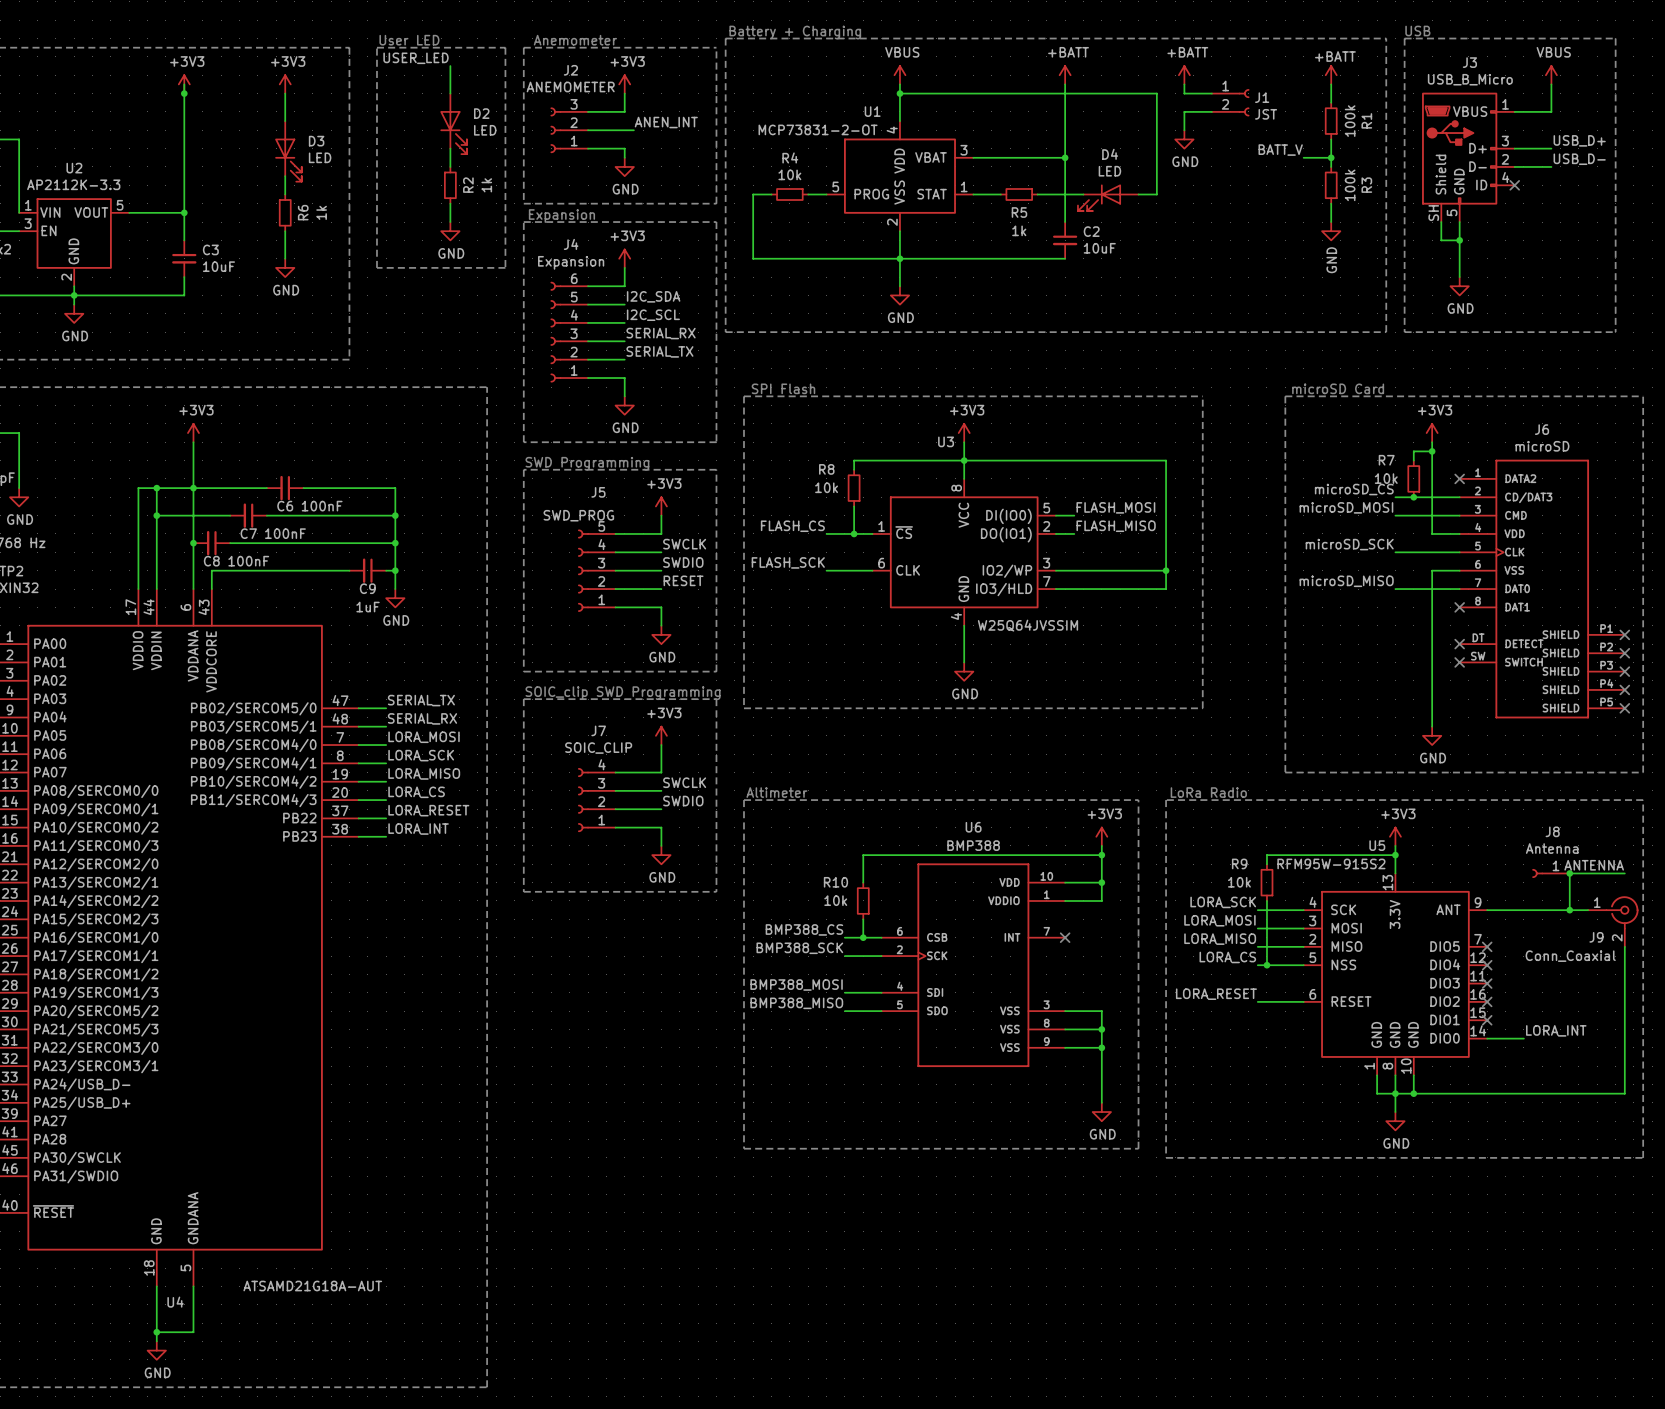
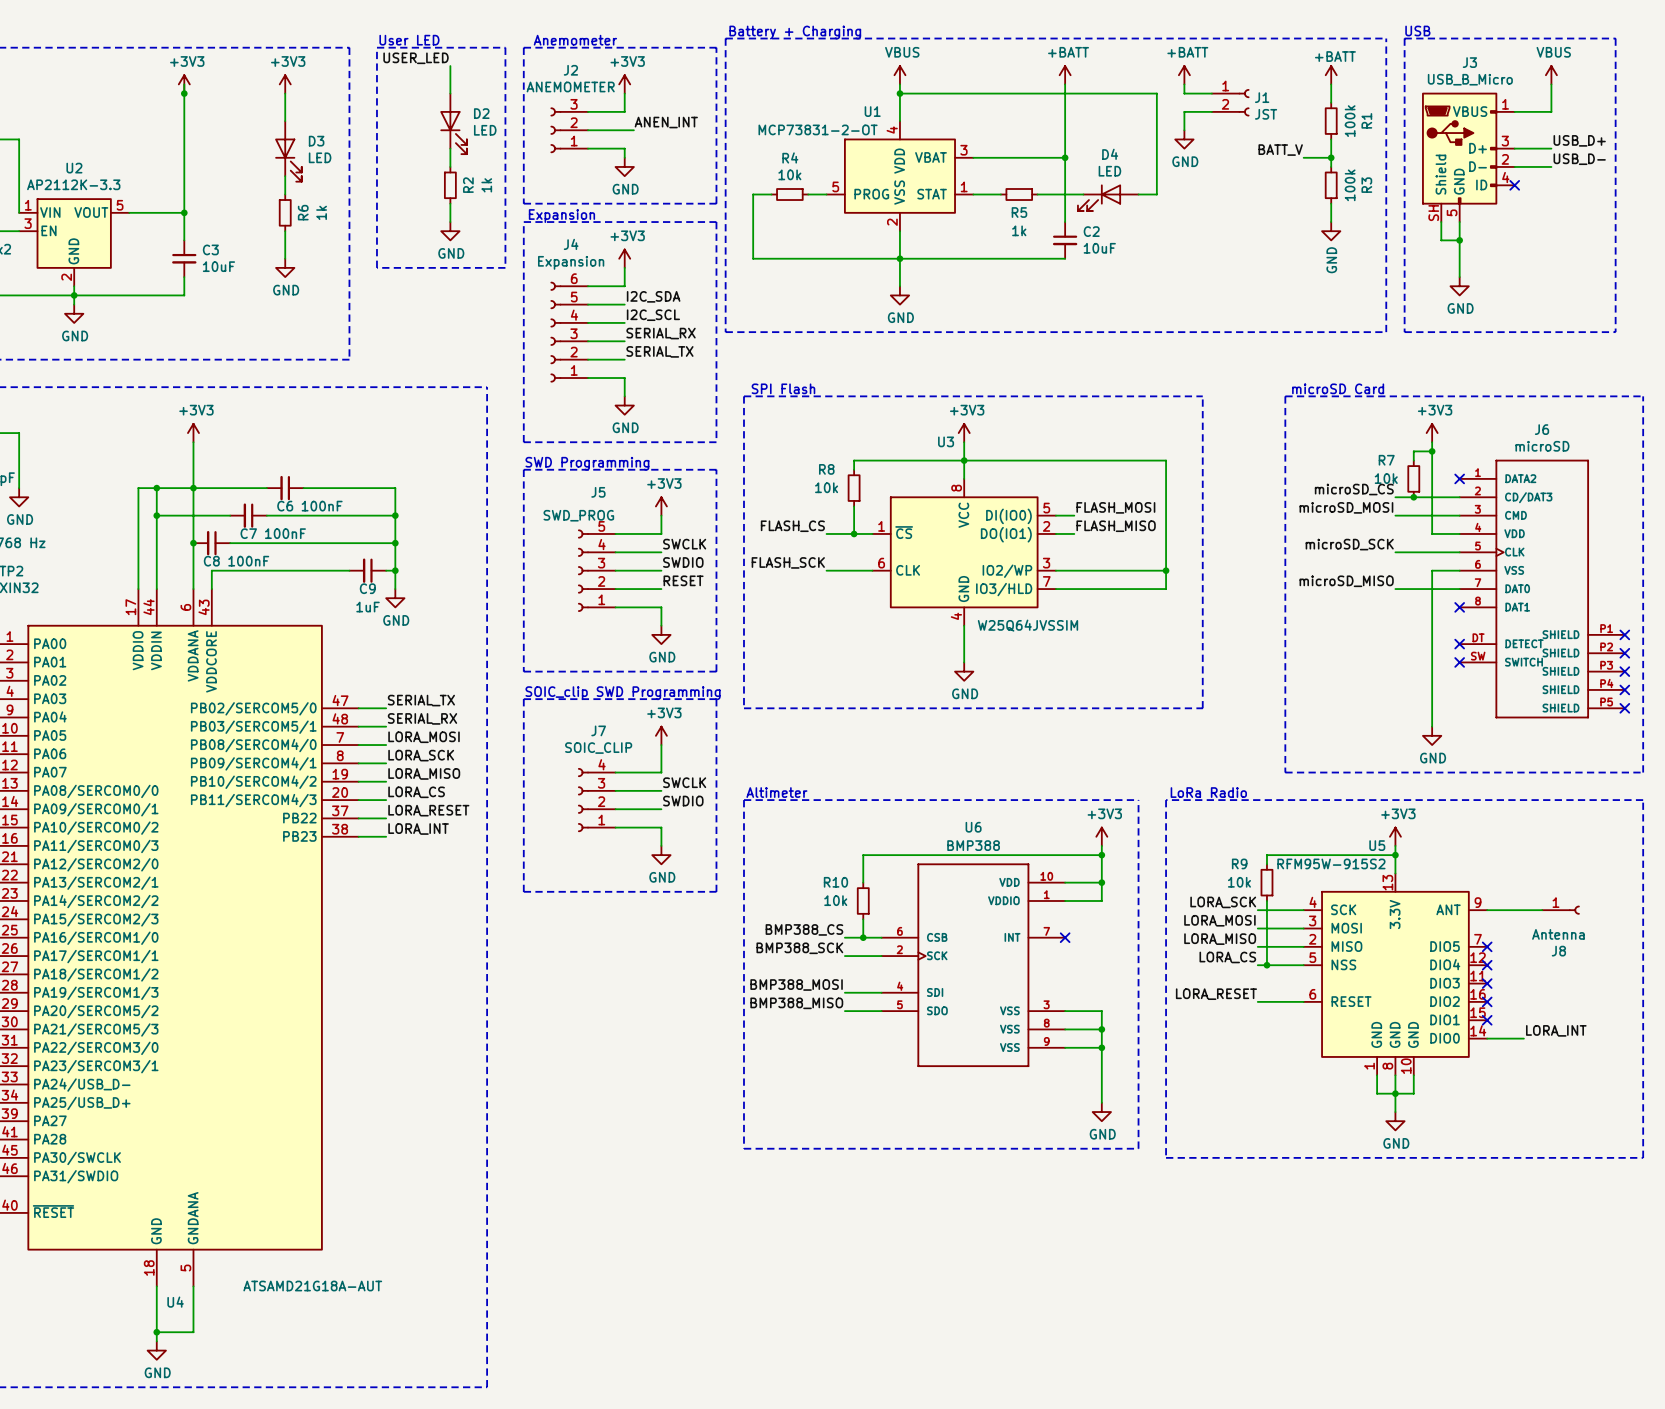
label: ANTENNA (1594, 865) -> none
J8 rotation: 0° (1537, 873) -> 180° (1574, 910)
J8 position: (1551, 873) -> (1560, 910)
junction: (1569, 873) -> none
wire: (1624, 873) (1569, 873) (1569, 910) -> none
junction: (1569, 910) -> none
J9: Conn_Coaxial (1613, 921) -> none
wire: (1624, 946) (1624, 1093) (1413, 1093) -> none
junction: (1413, 1093) -> none

